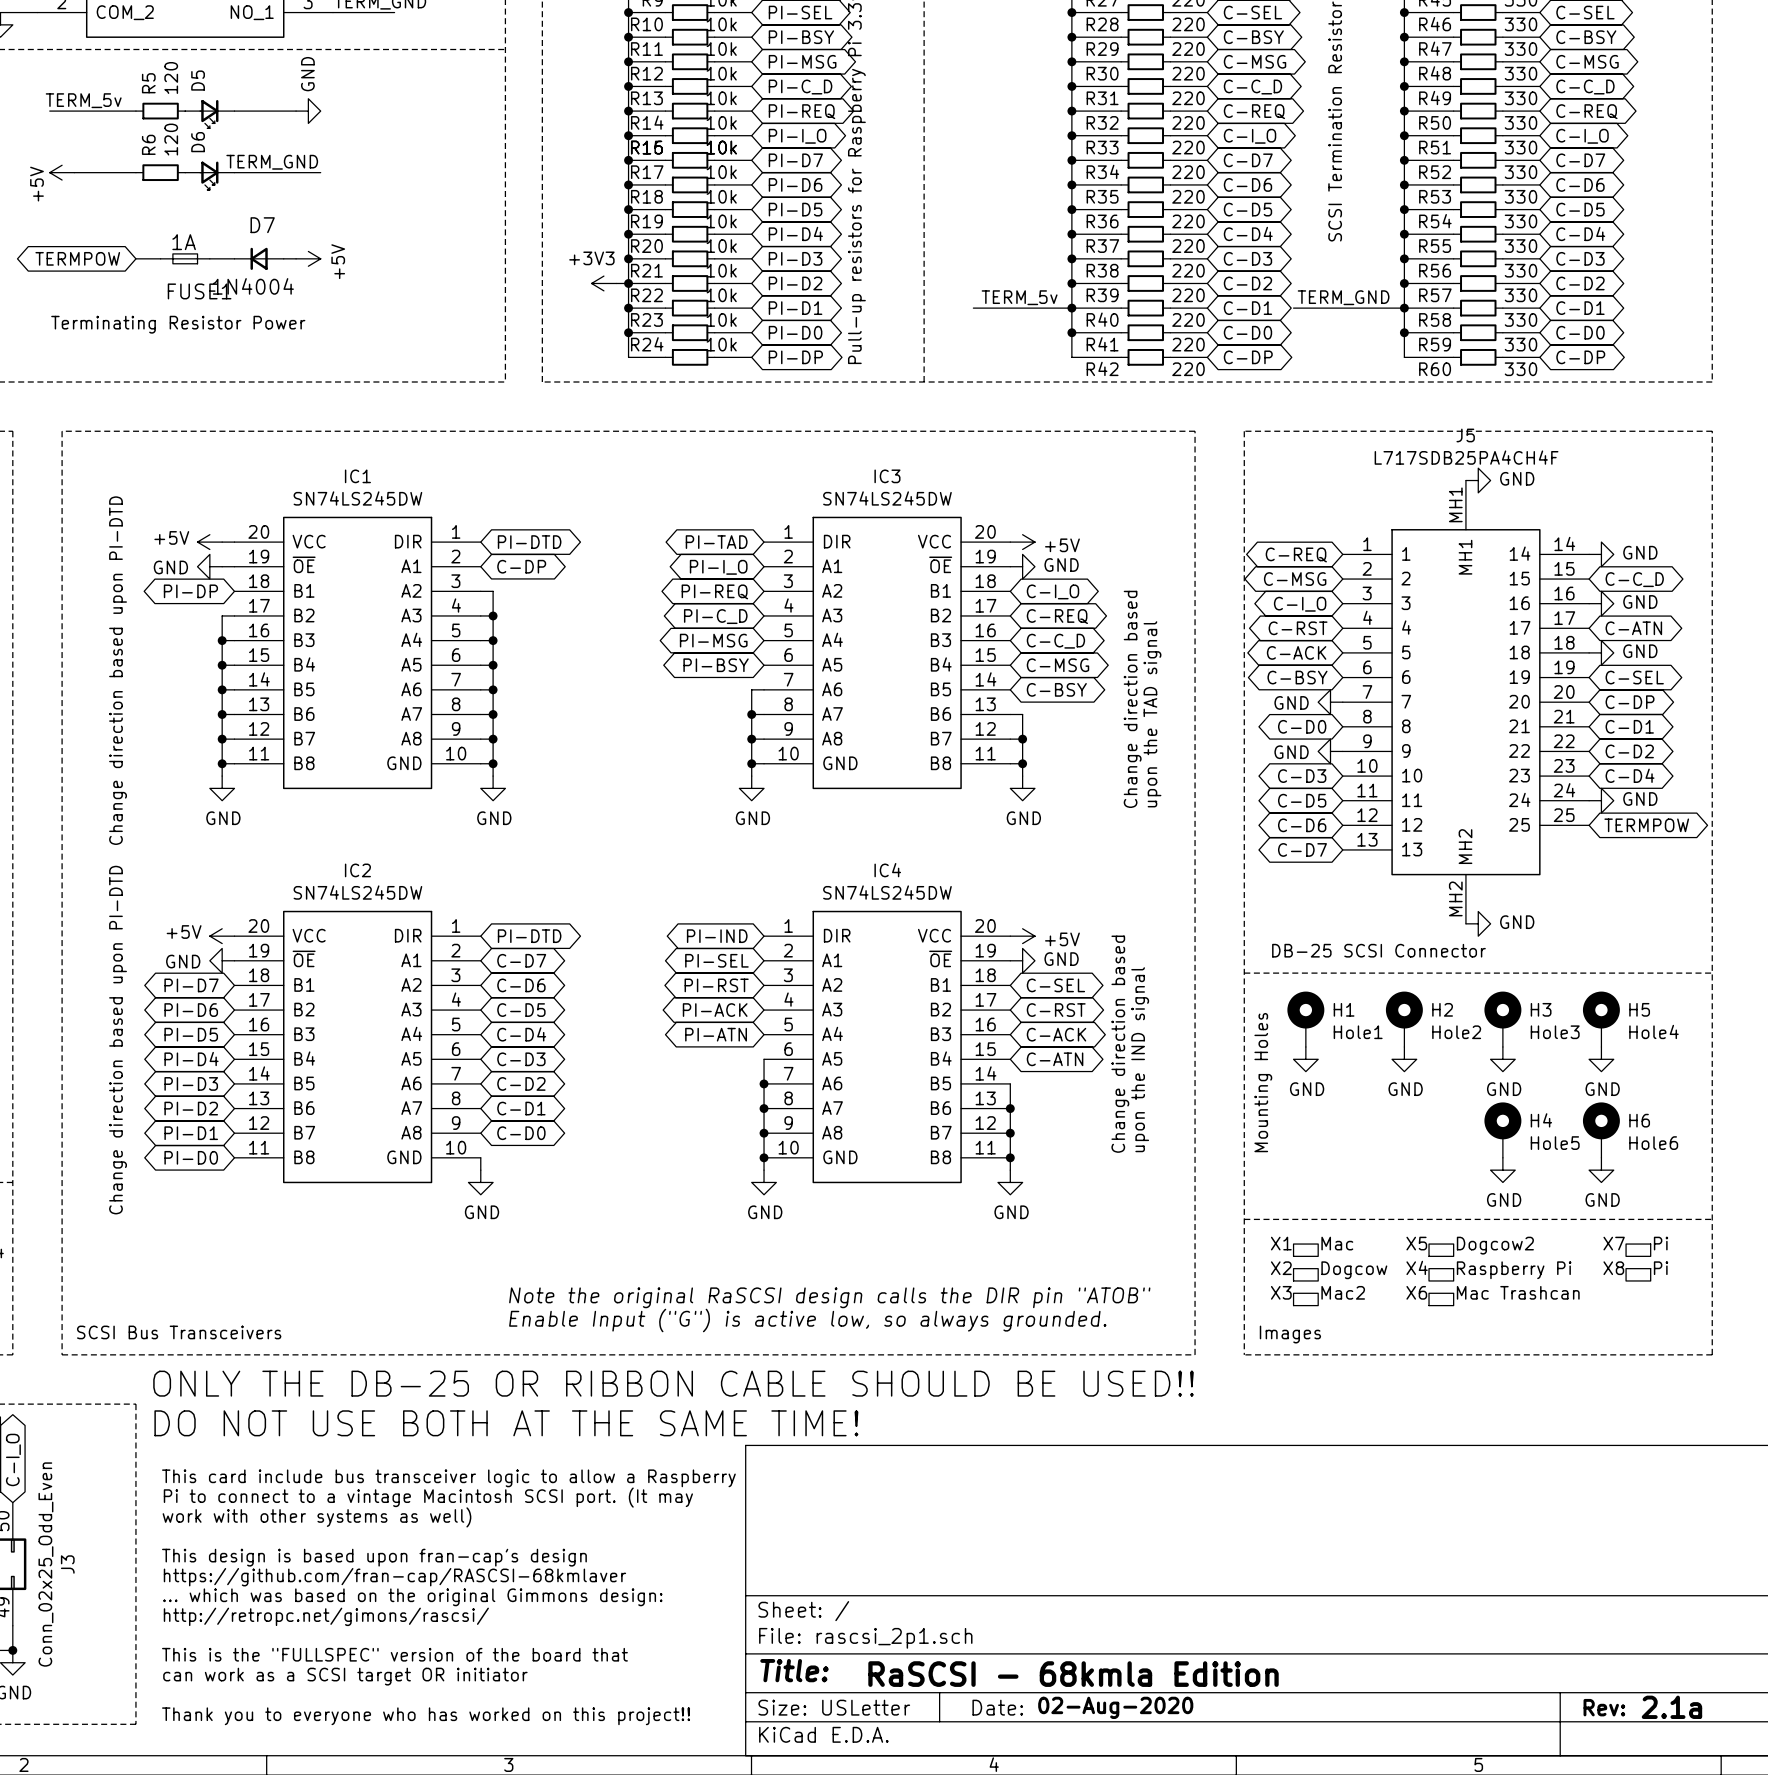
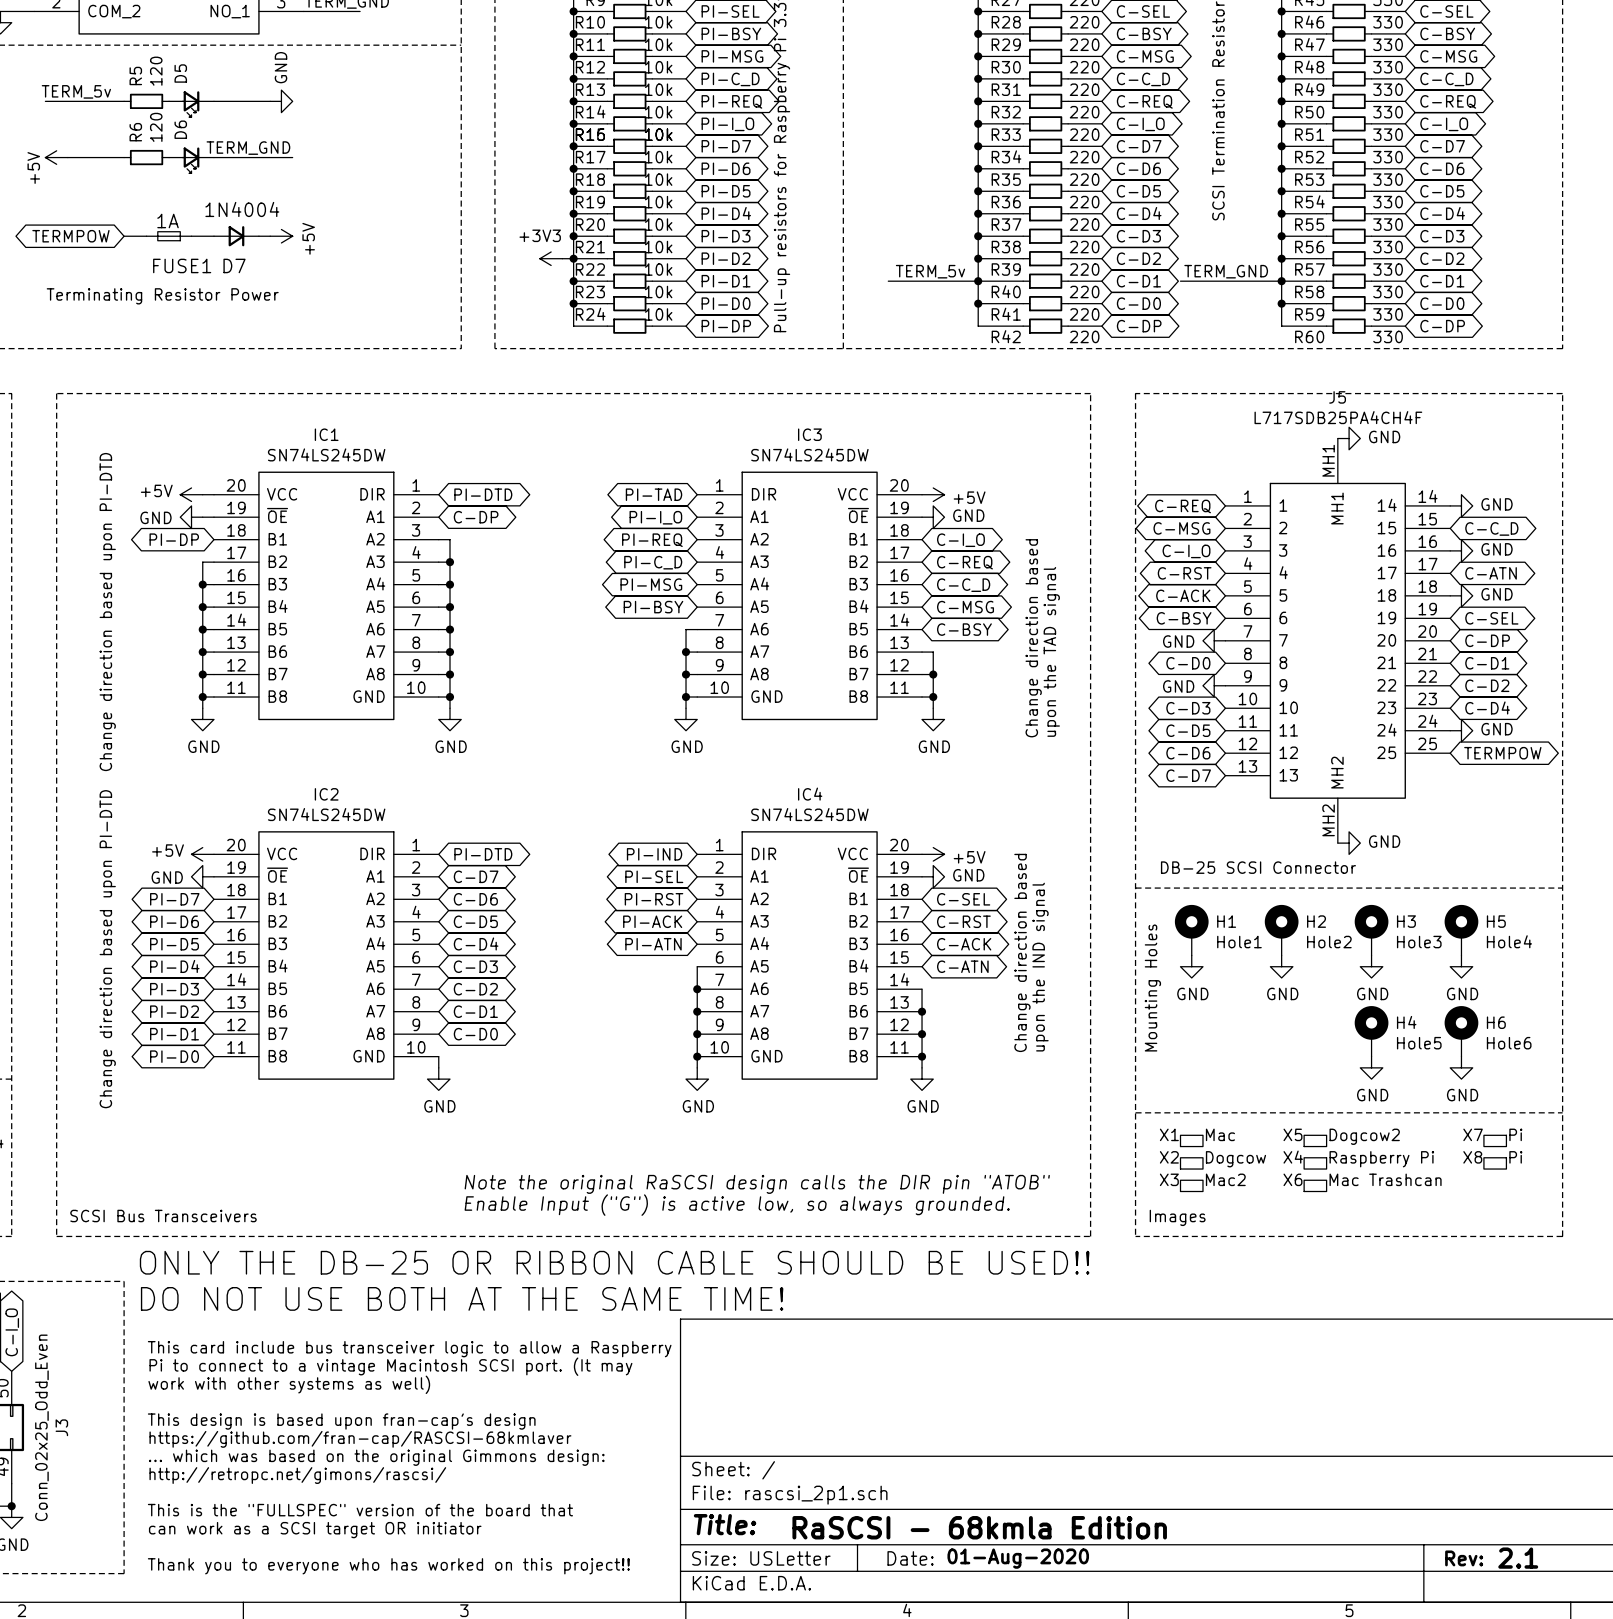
D7 rotation: 0° (259, 258) -> 180° (236, 236)
text: 02-Aug-2020 (1115, 1707) -> 01-Aug-2020 (1018, 1558)
text: 2.1a (1671, 1707) -> 2.1 (1518, 1558)

